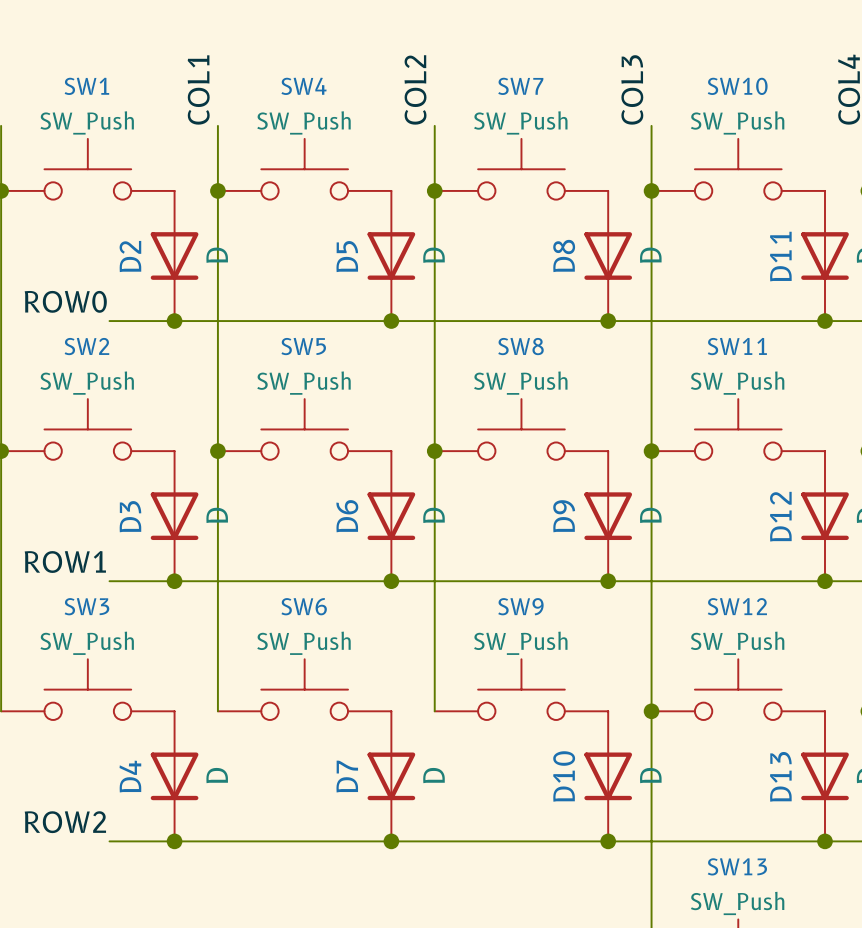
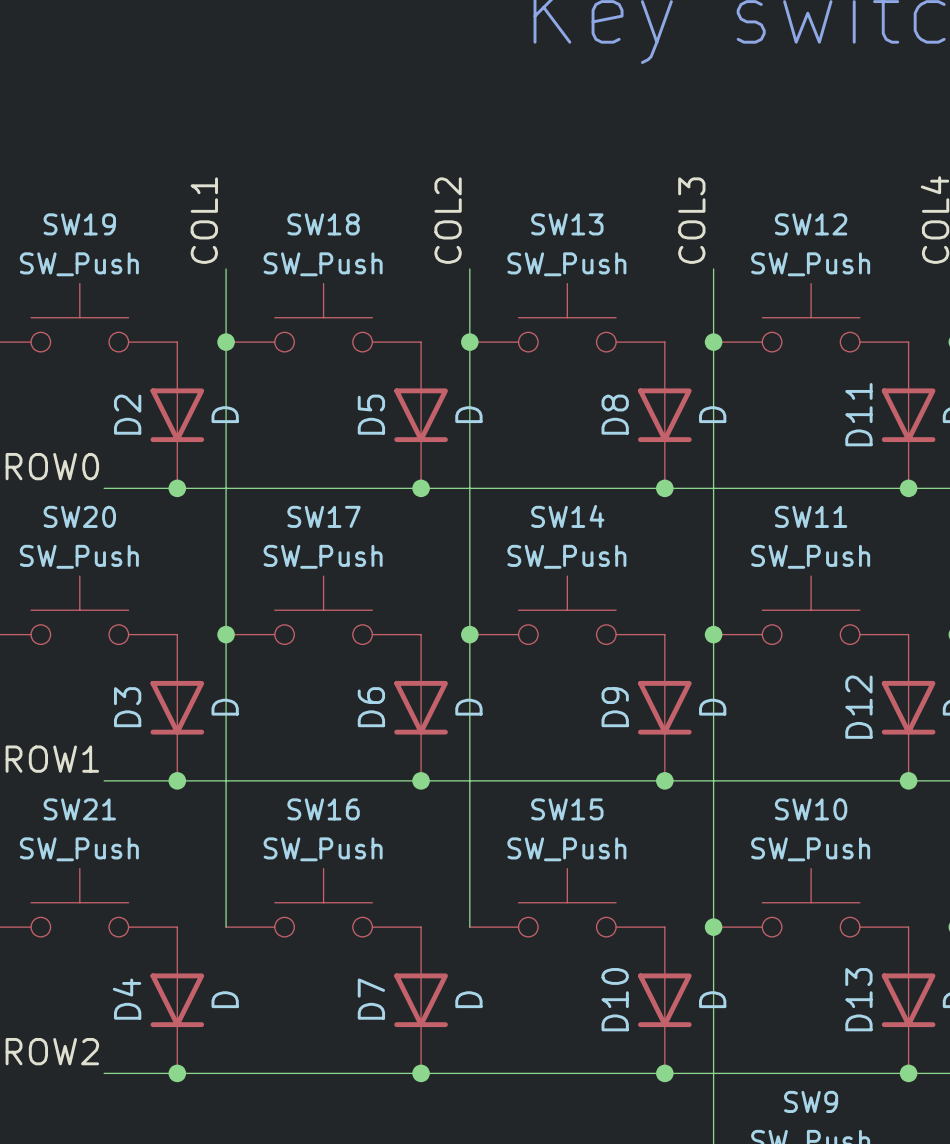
SW1 name: SW1 (86, 86) -> SW19 (79, 224)
SW4 name: SW4 (303, 86) -> SW18 (323, 224)
SW7 name: SW7 (520, 86) -> SW13 (567, 224)
SW10 name: SW10 (737, 86) -> SW12 (811, 224)
SW2 name: SW2 (86, 346) -> SW20 (79, 516)
SW5 name: SW5 (303, 346) -> SW17 (324, 516)
SW8 name: SW8 (520, 346) -> SW14 (567, 516)
SW3 name: SW3 (86, 606) -> SW21 (79, 809)
SW6 name: SW6 (304, 606) -> SW16 (323, 809)
SW9 name: SW9 (520, 606) -> SW15 (567, 809)
SW12 name: SW12 (737, 606) -> SW10 (811, 809)
SW13 name: SW13 (737, 866) -> SW9 (811, 1101)

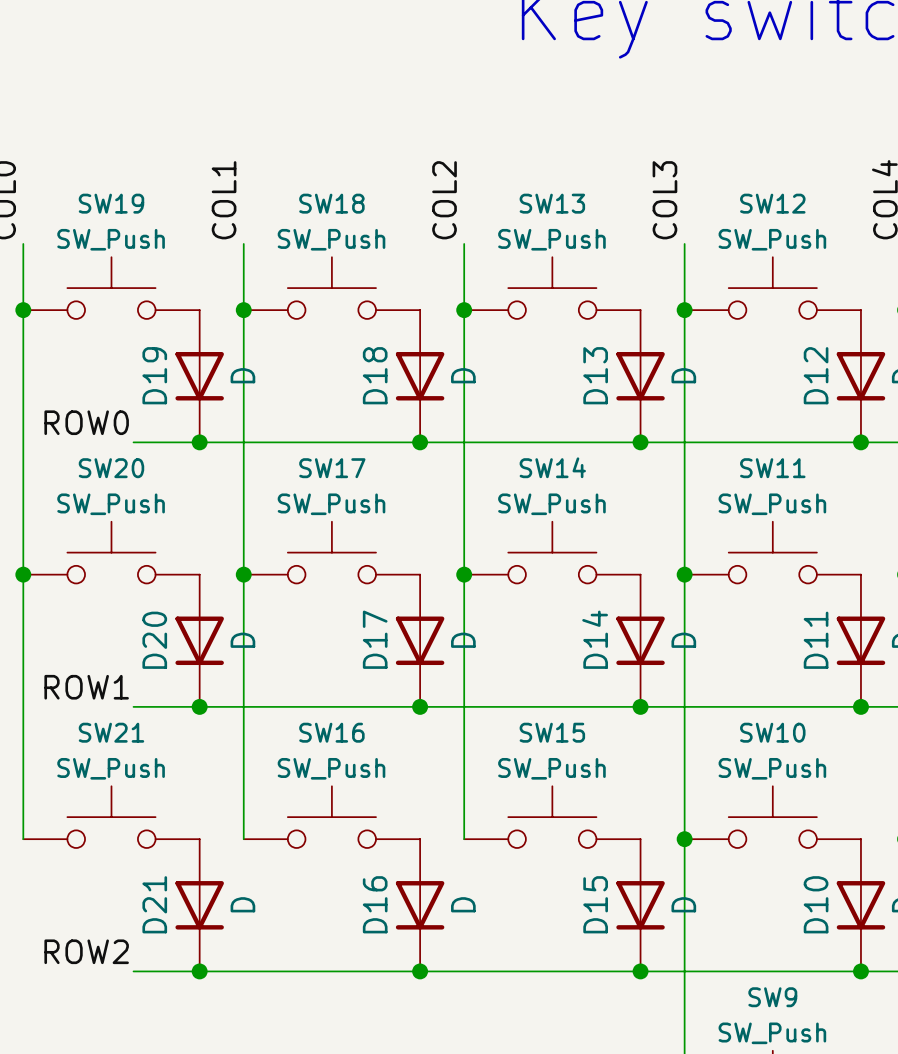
D2 name: D2 (127, 414) -> D19 (154, 375)
D5 name: D5 (371, 414) -> D18 (375, 375)
D8 name: D8 (615, 414) -> D13 (595, 375)
D11 name: D11 (858, 414) -> D12 (816, 375)
D3 name: D3 (127, 707) -> D20 (154, 640)
D6 name: D6 (371, 707) -> D17 (375, 639)
D9 name: D9 (615, 707) -> D14 (595, 639)
D12 name: D12 (858, 707) -> D11 (816, 640)
D4 name: D4 (127, 999) -> D21 (154, 904)
D7 name: D7 (371, 999) -> D16 (375, 904)
D10 name: D10 (615, 999) -> D15 (595, 904)
D13 name: D13 (858, 999) -> D10 (816, 904)

